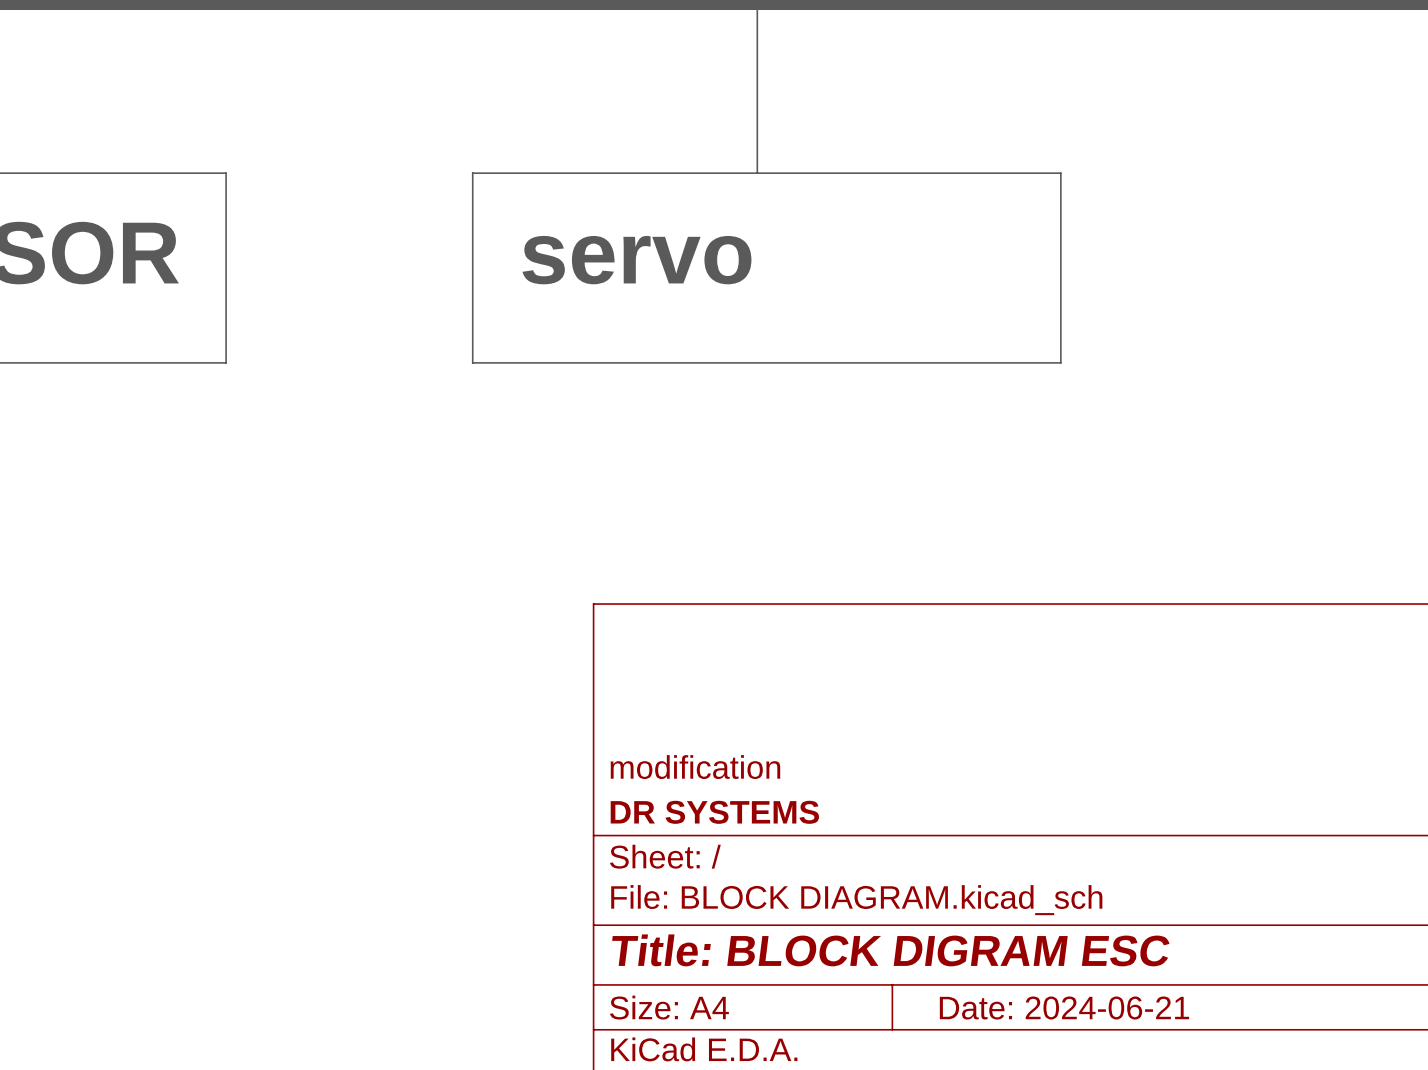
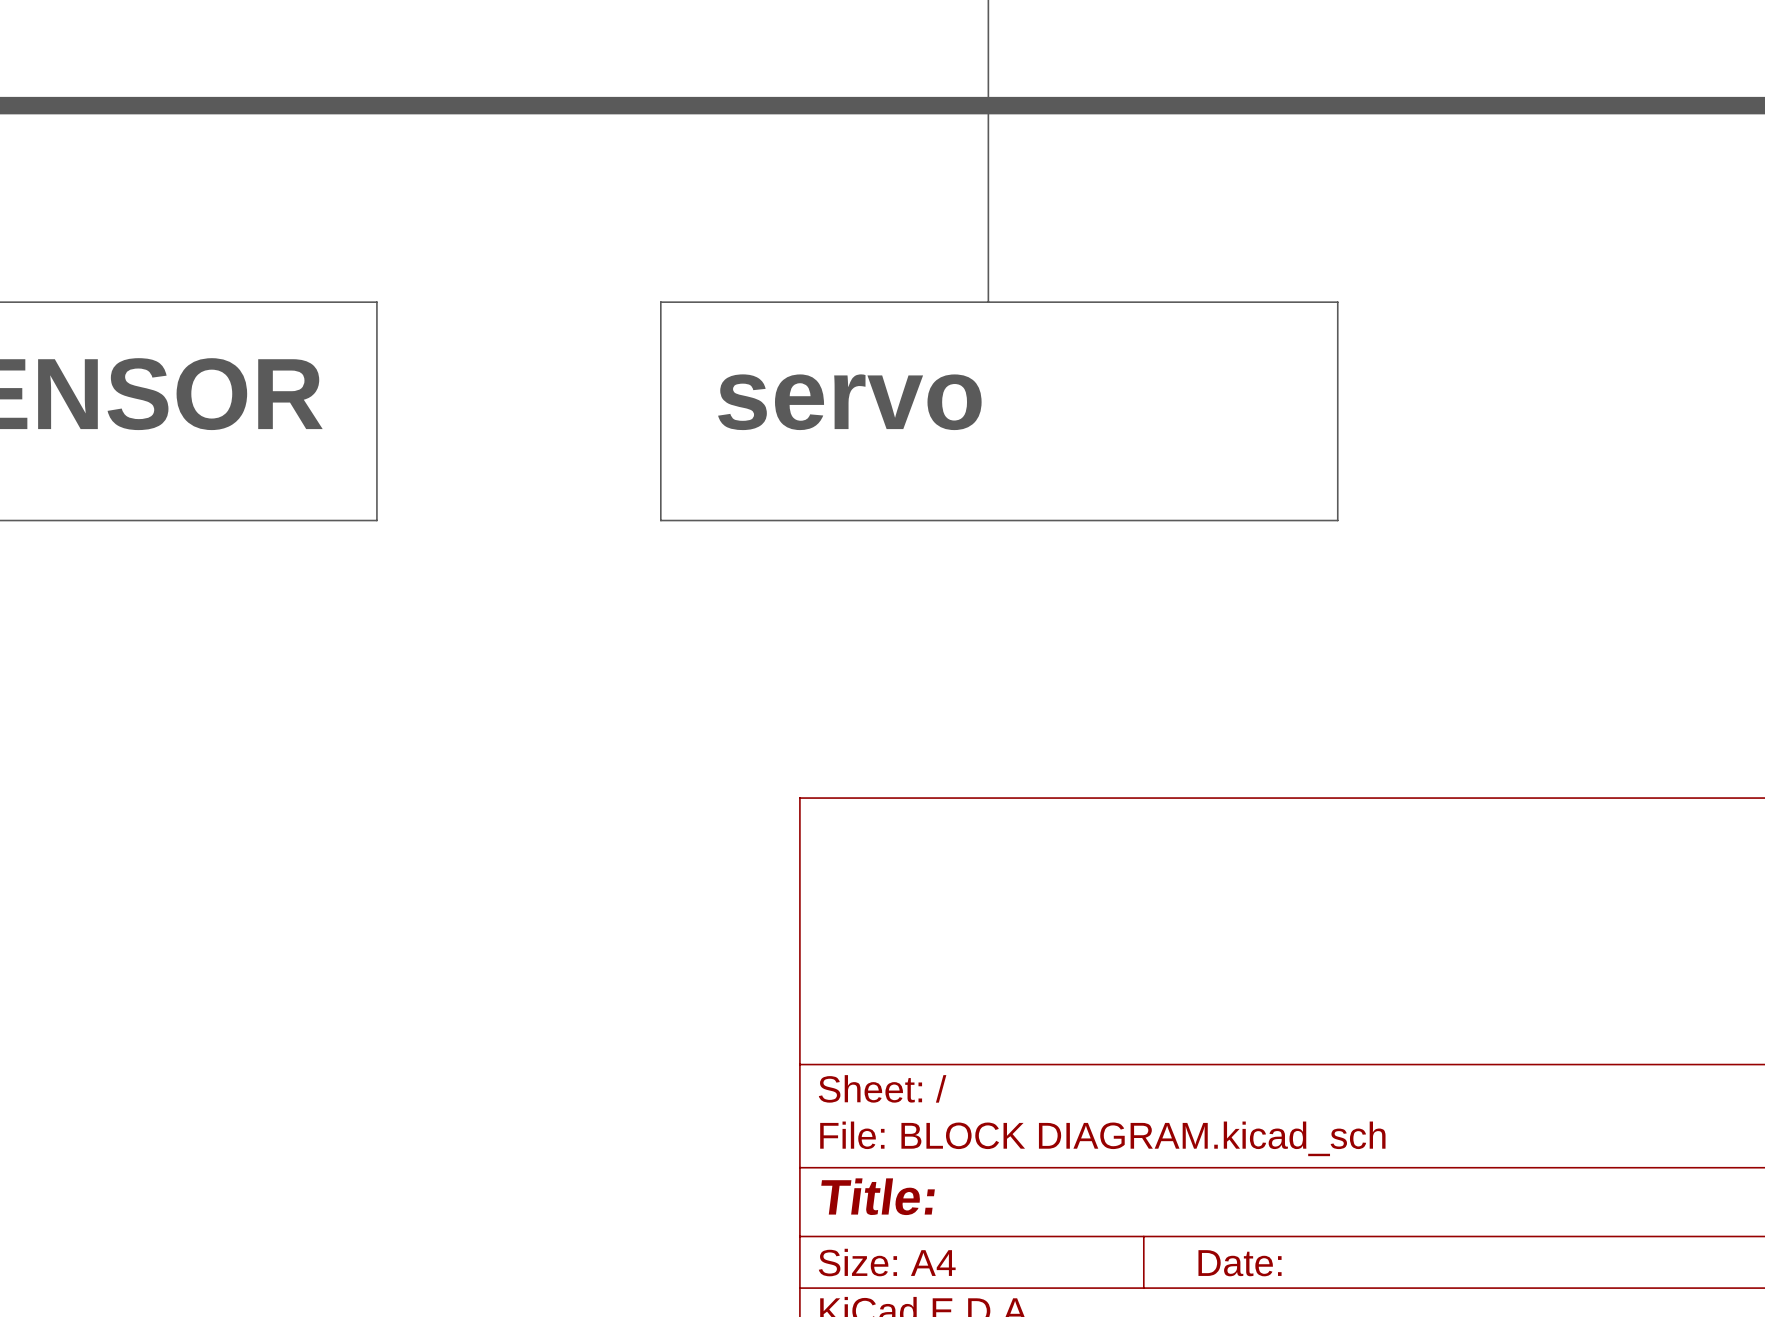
title block: modification (695, 767) -> none
title block: DR SYSTEMS (714, 812) -> none
title block: Title: BLOCK DIGRAM ESC (890, 950) -> Title: (878, 1196)
title block: Date: 2024-06-21 (1064, 1008) -> Date: (1240, 1263)

